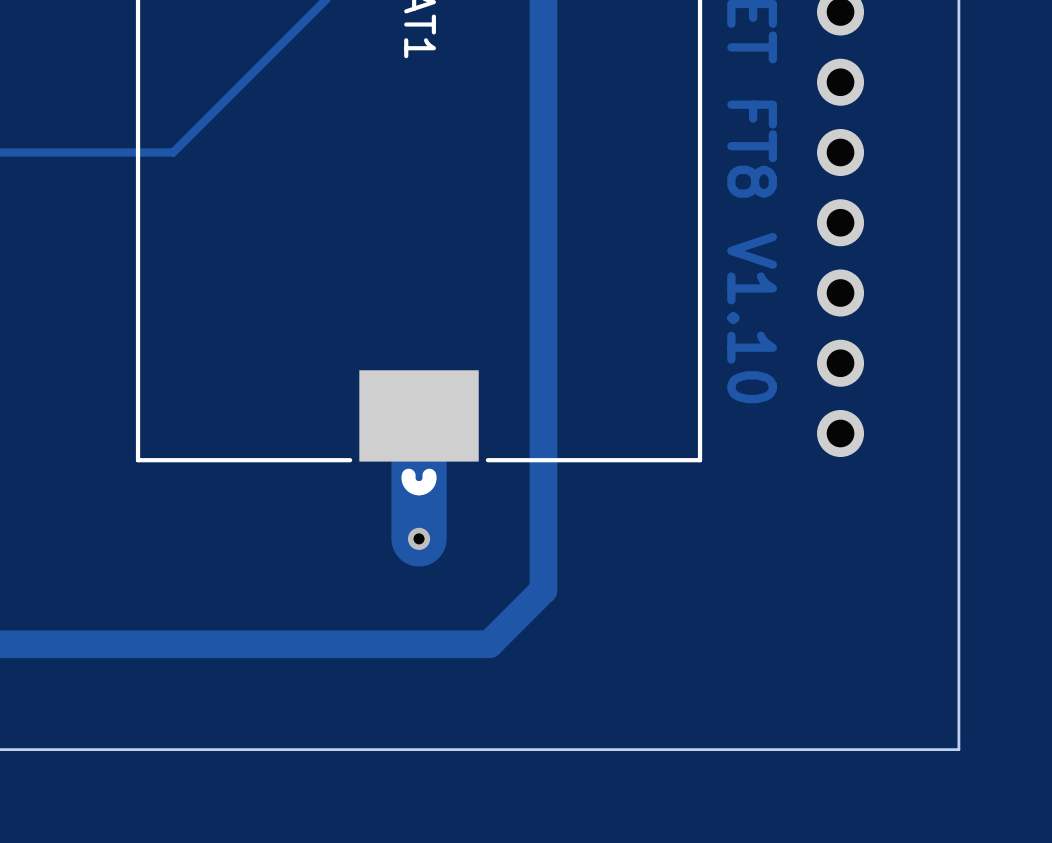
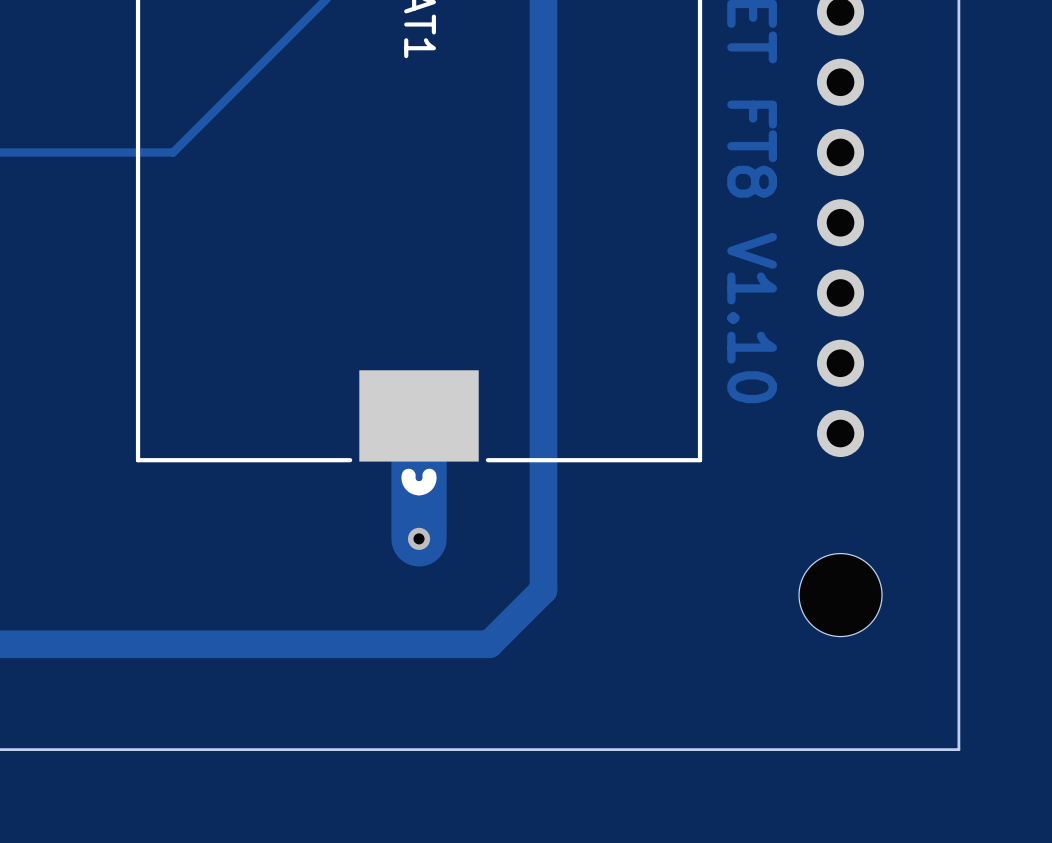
part: none -> (840, 595)

